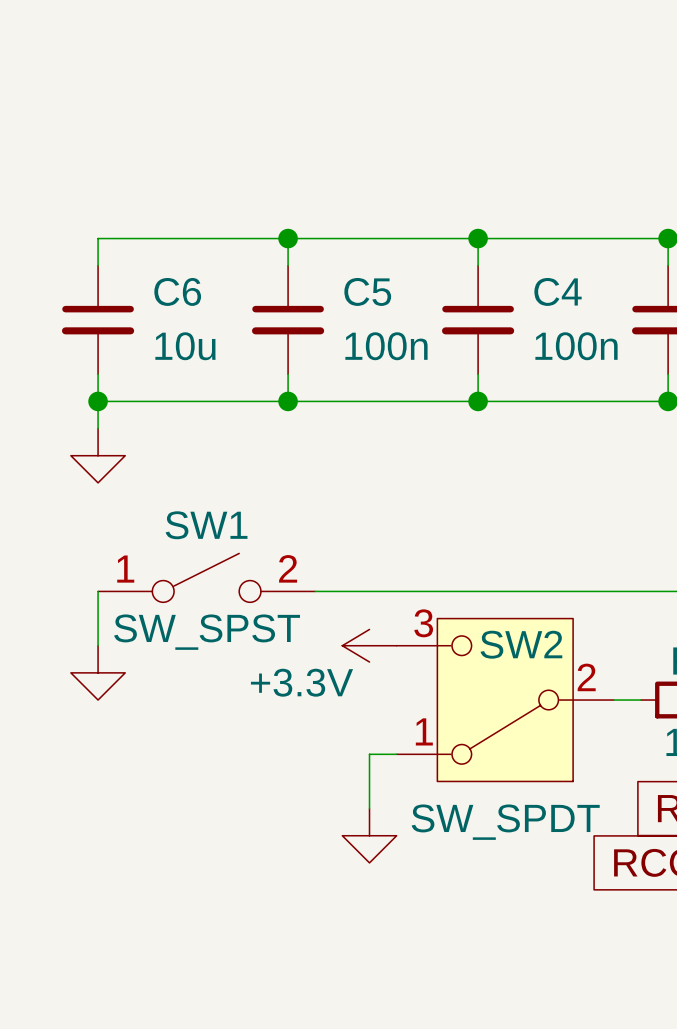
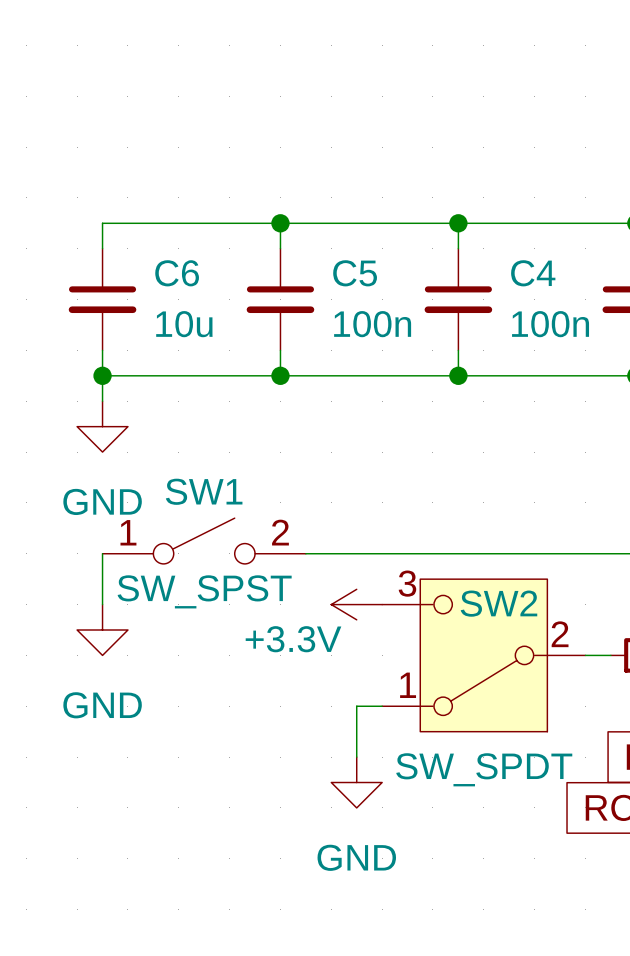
power symbol text: none -> GND (102, 501)
power symbol text: none -> GND (102, 705)
power symbol text: none -> GND (356, 857)

